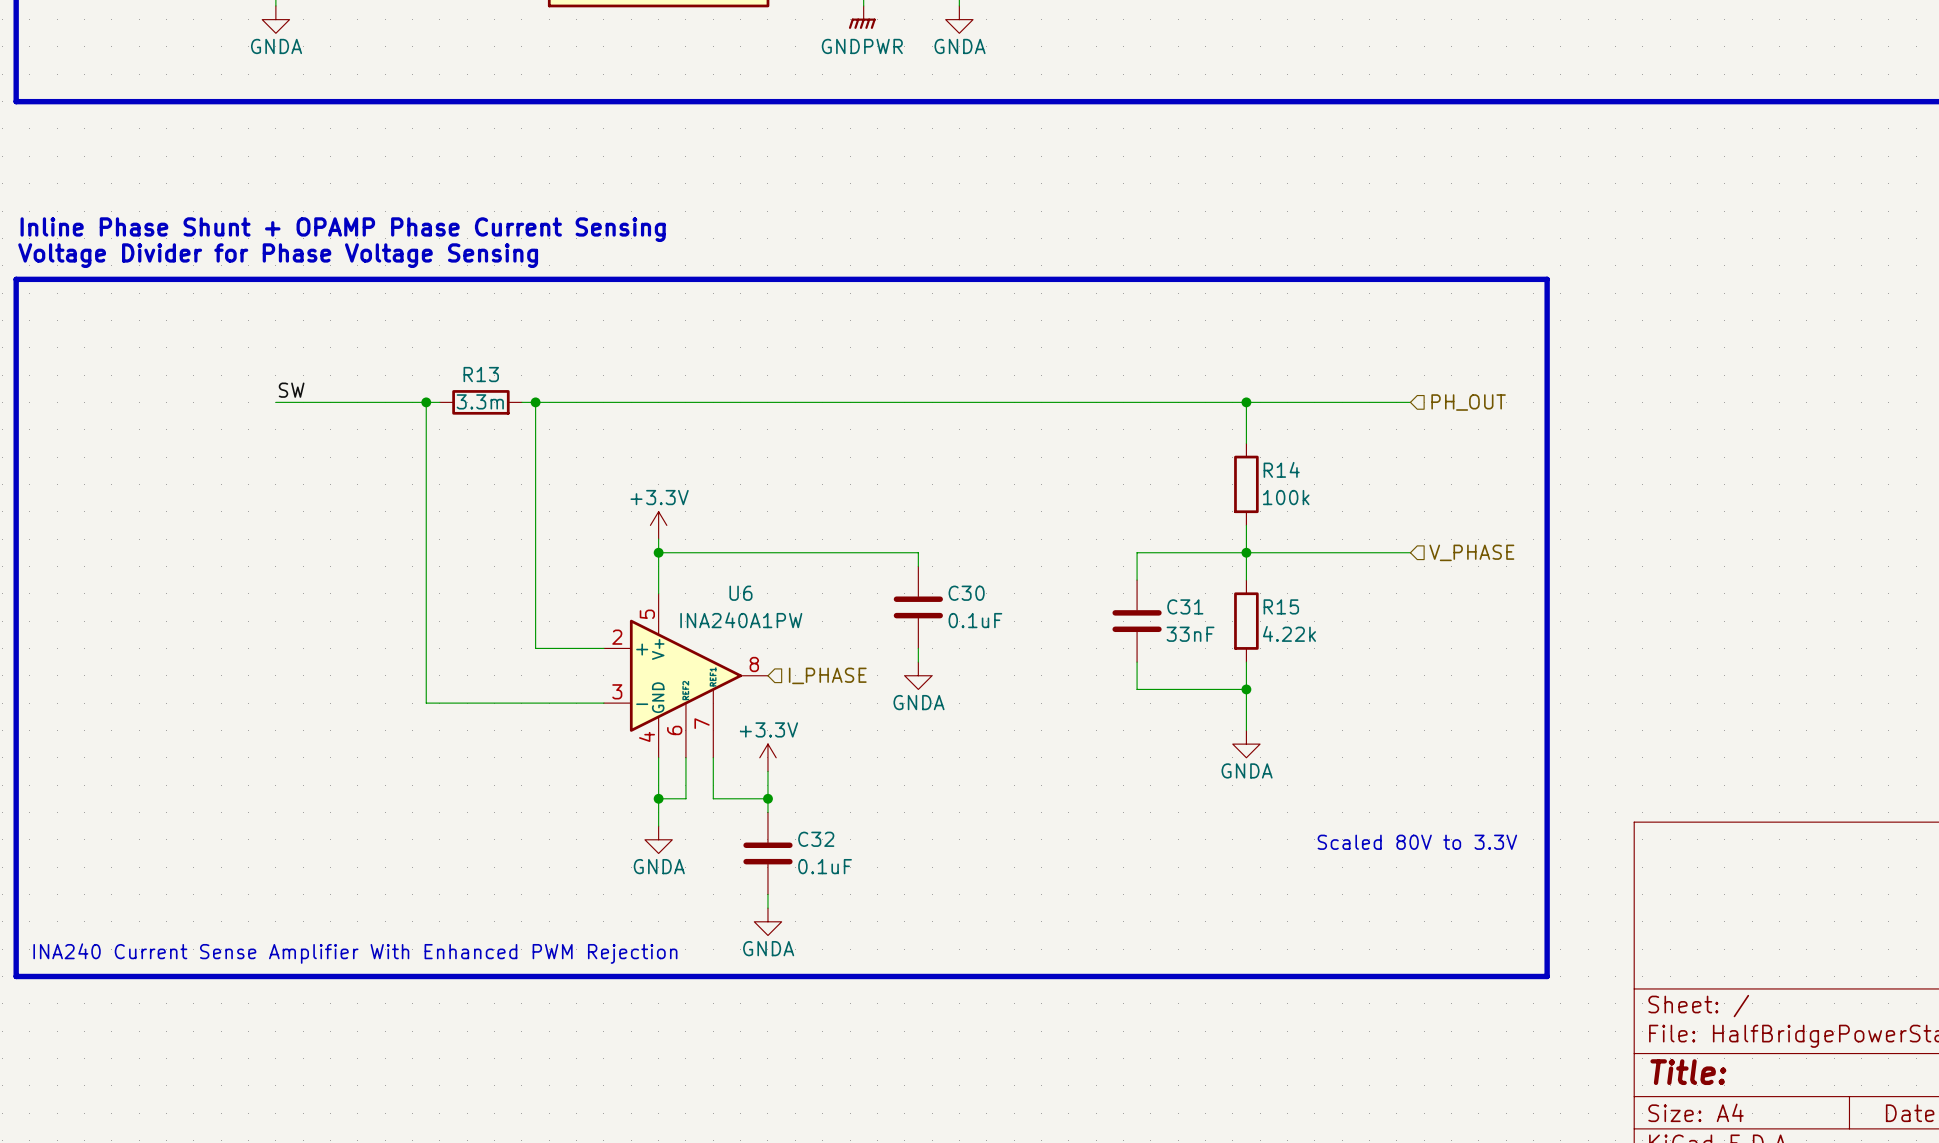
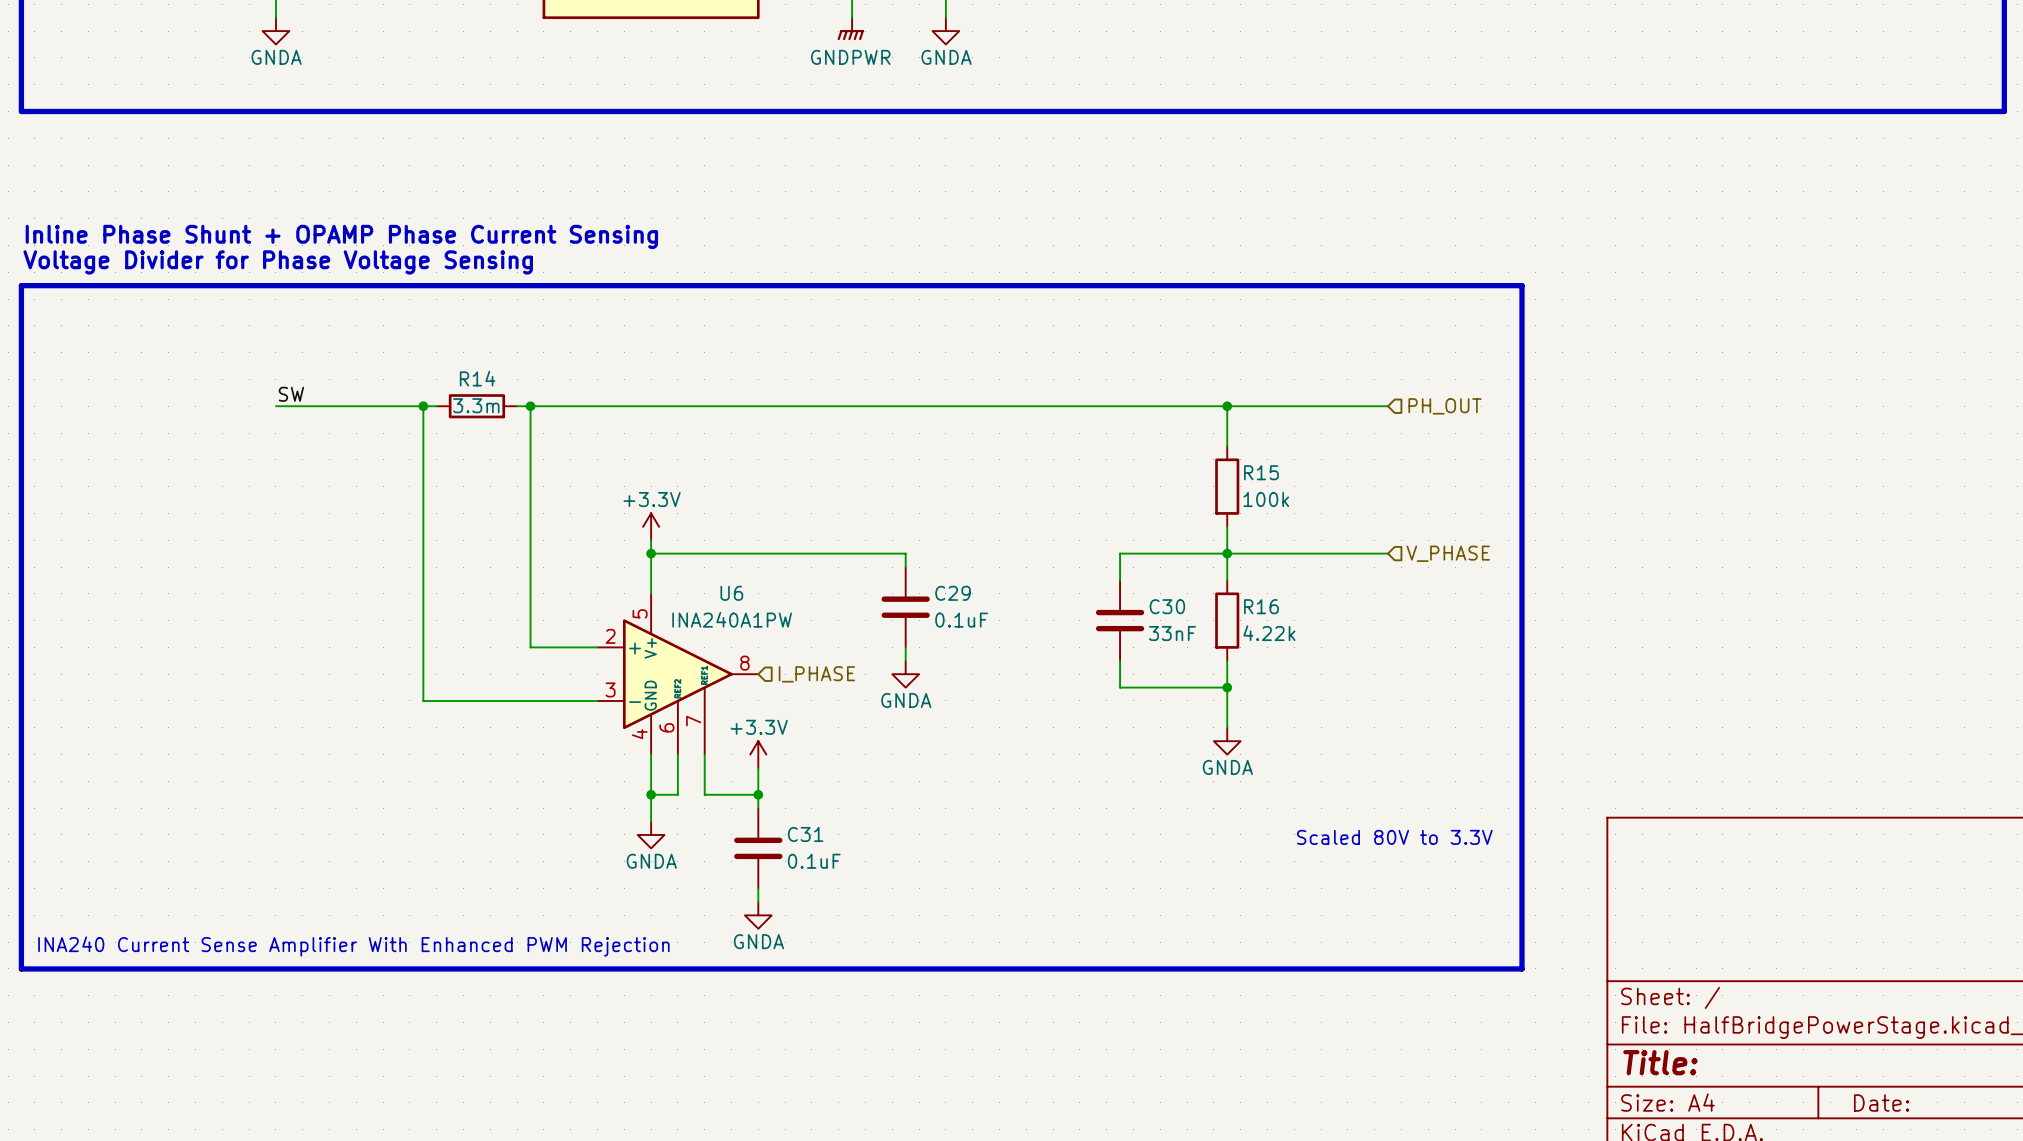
R13 name: R13 (481, 374) -> R14 (477, 378)
R14 name: R14 (1281, 469) -> R15 (1261, 472)
C30 name: C30 (966, 593) -> C29 (953, 593)
C31 name: C31 (1185, 606) -> C30 (1167, 606)
R15 name: R15 (1281, 606) -> R16 (1261, 606)
C32 name: C32 (816, 839) -> C31 (805, 834)

